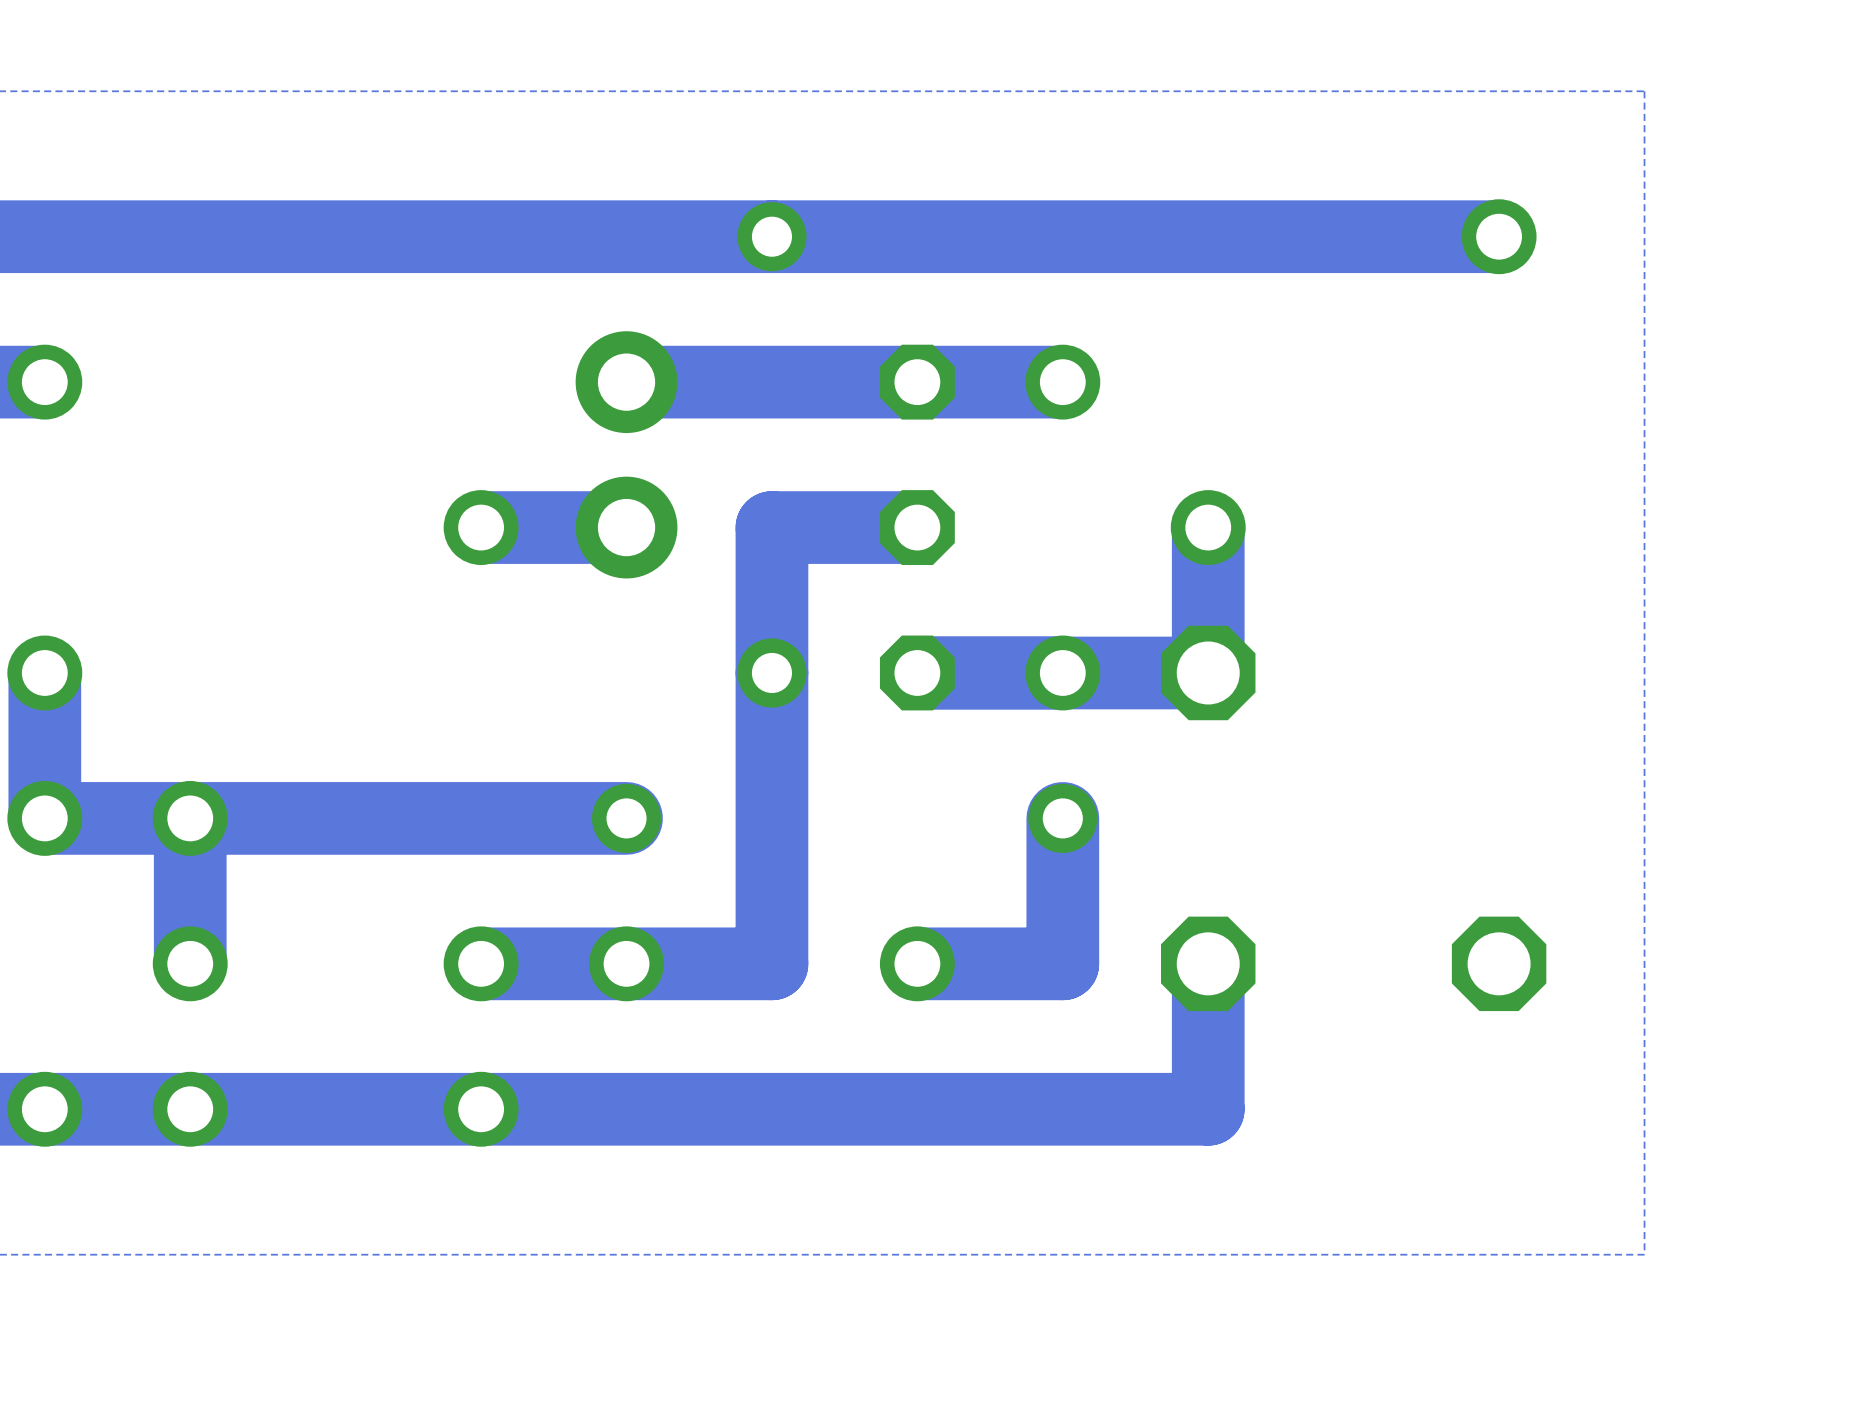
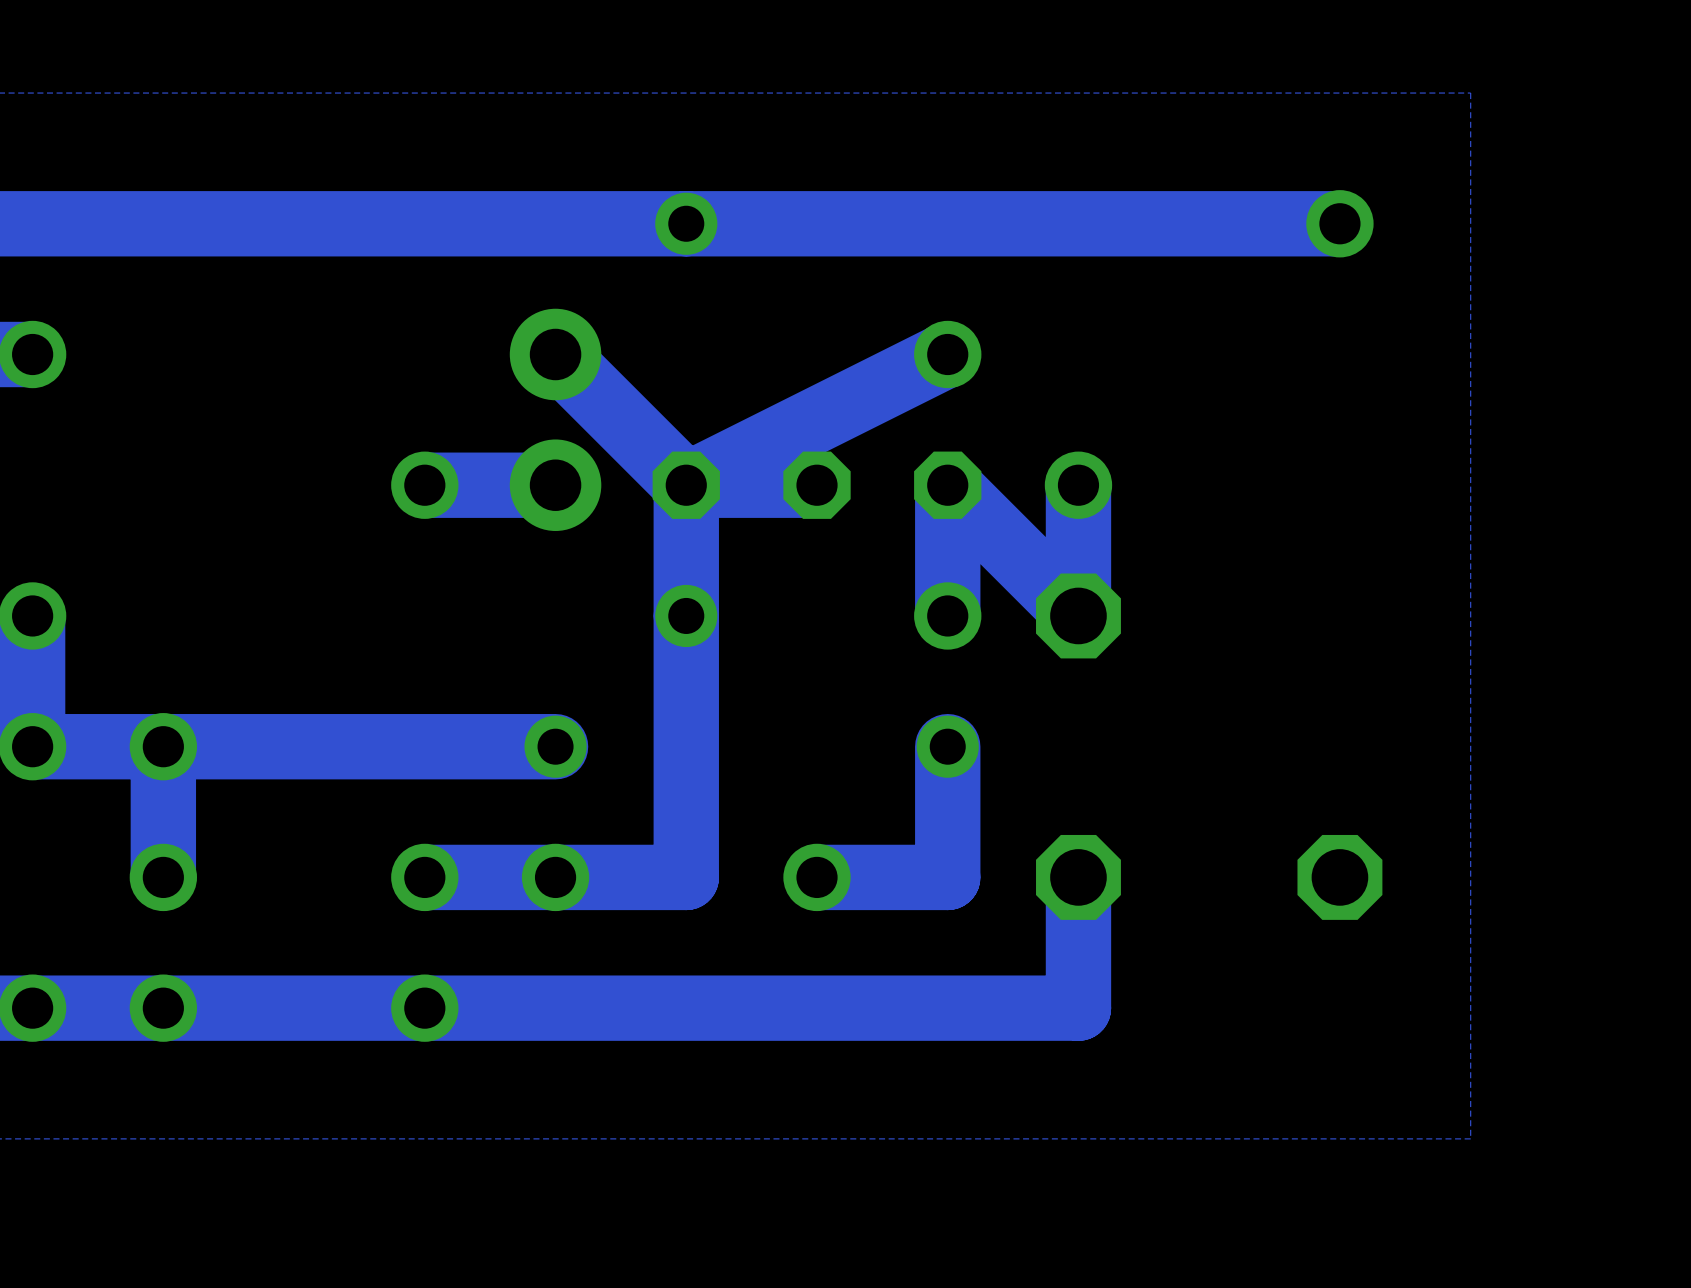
track: (1062, 382) (626, 382) -> (947, 354) (686, 485) (555, 354)
part rotation: 0° (917, 527) -> 90° clockwise (817, 485)
track: (1208, 672) (917, 672) -> (1078, 615) (947, 485) (947, 615)

